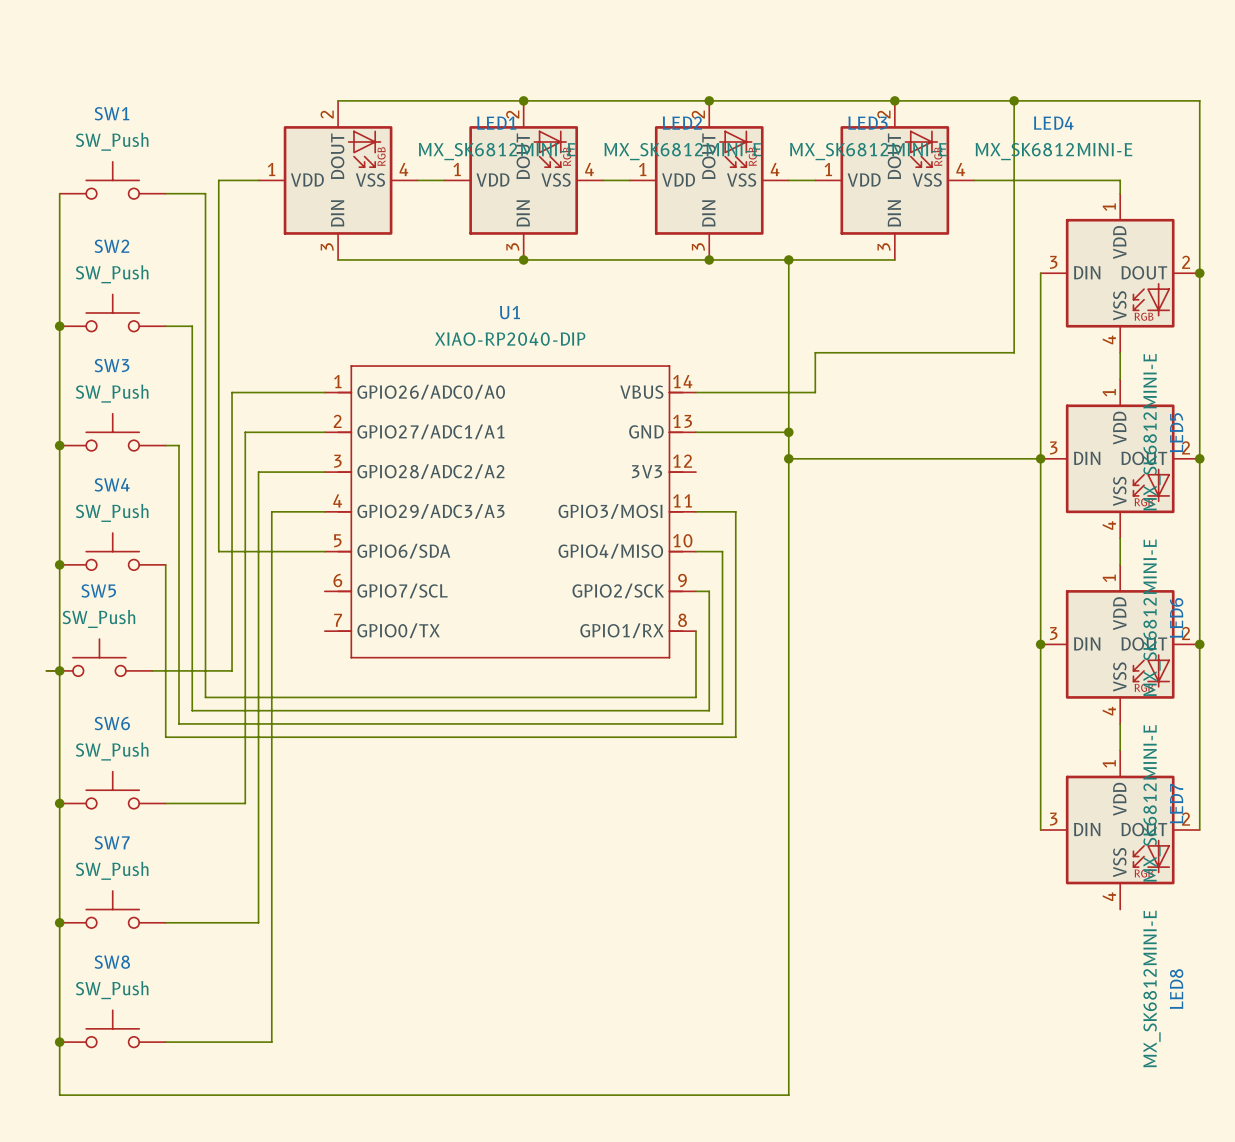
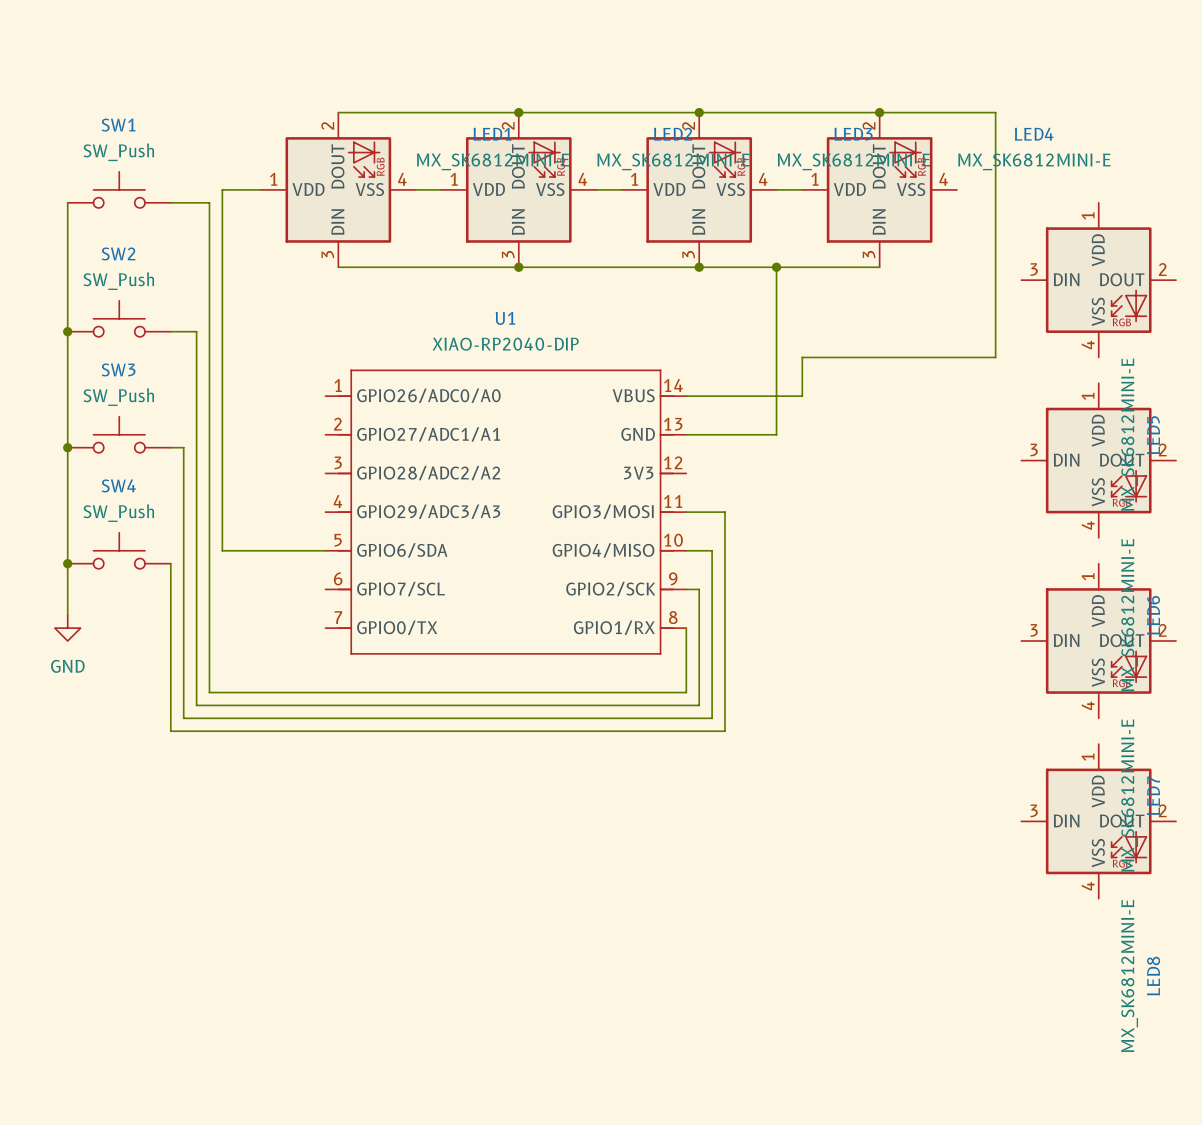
wire: (1014, 100) (1199, 100) (1199, 830) -> none
junction: (1014, 100) -> none
wire: (974, 180) (1120, 180) (1120, 193) -> none
wire: (1040, 273) (1040, 830) -> none
junction: (1199, 273) -> none
wire: (1120, 352) (1120, 379) -> none
wire: (324, 392) (232, 392) (232, 670) (152, 670) -> none
wire: (324, 432) (245, 432) (245, 803) (165, 803) -> none
wire: (788, 432) (788, 1095) (59, 1095) (59, 617) -> none
junction: (788, 432) -> none
wire: (788, 458) (1040, 458) -> none
junction: (788, 458) -> none
junction: (1040, 458) -> none
junction: (1199, 458) -> none
wire: (324, 472) (258, 472) (258, 922) (165, 922) -> none
wire: (324, 511) (271, 511) (271, 1042) (165, 1042) -> none
wire: (1120, 538) (1120, 564) -> none
power symbol: none -> GND (67, 628)
junction: (1040, 644) -> none
junction: (1199, 644) -> none
SW5: SW_Push (99, 657) -> none
wire: (46, 670) (59, 670) -> none
junction: (59, 670) -> none
wire: (1120, 723) (1120, 750) -> none
SW6: SW_Push (112, 790) -> none
junction: (59, 803) -> none
SW7: SW_Push (112, 909) -> none
junction: (59, 922) -> none
SW8: SW_Push (112, 1028) -> none
junction: (59, 1042) -> none

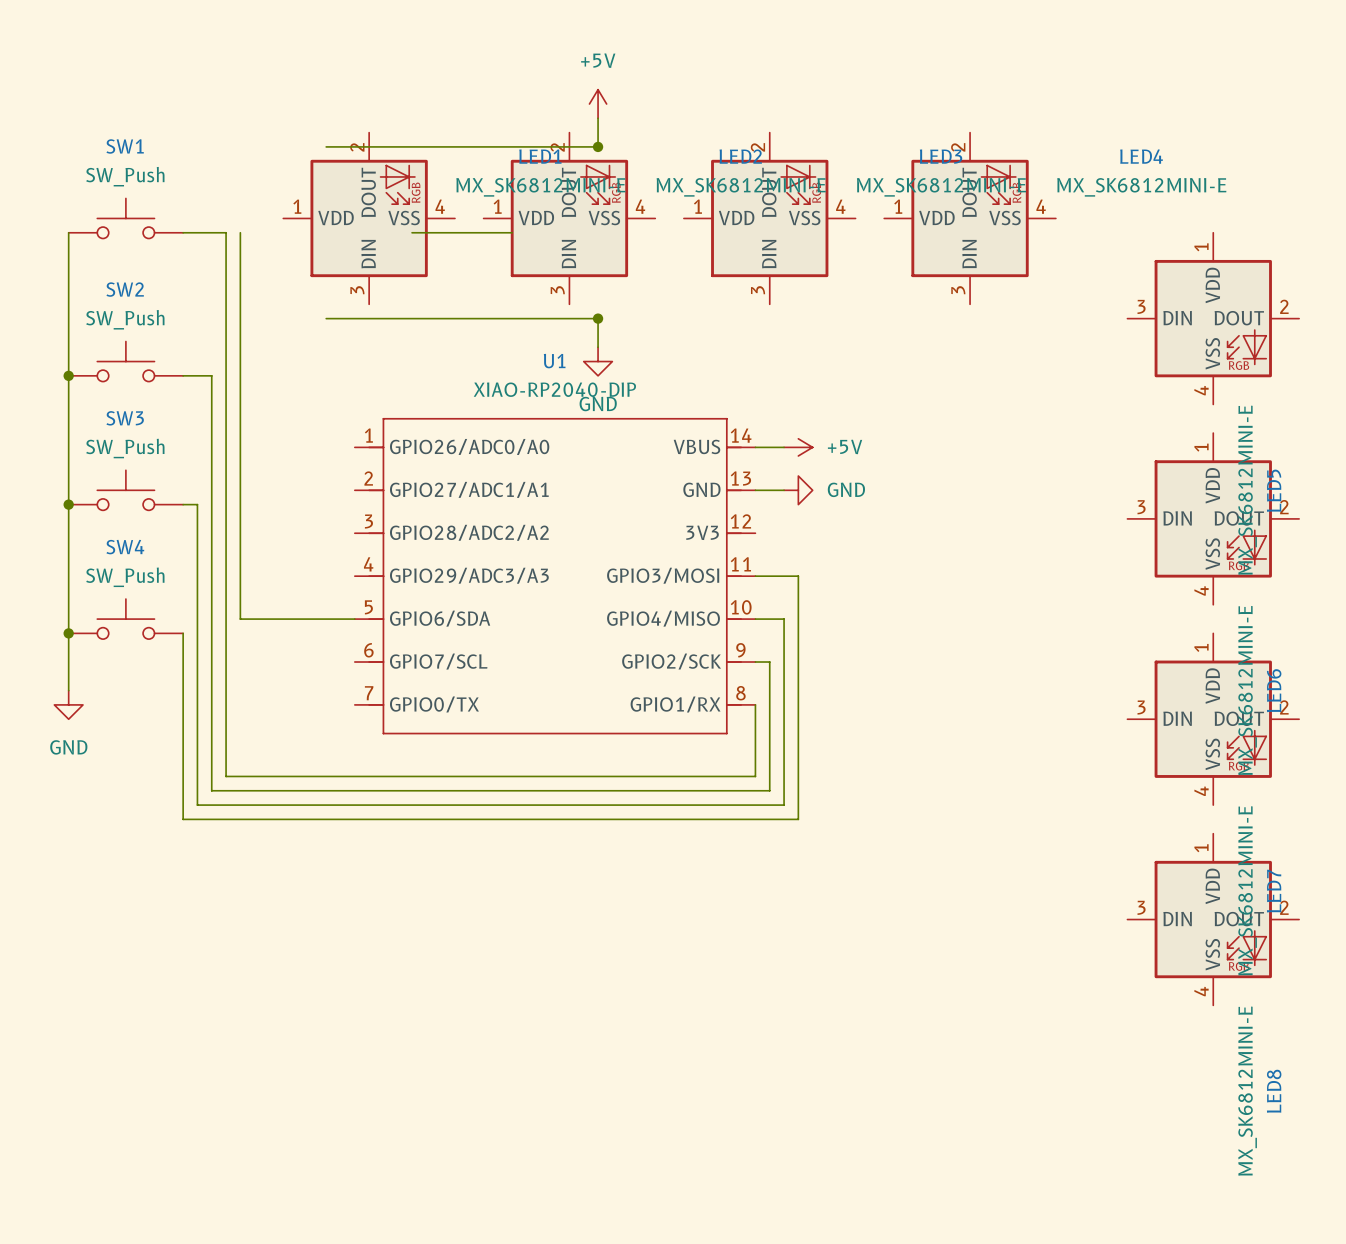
power symbol: none -> +5V (598, 104)
wire: none -> (598, 118) (598, 146) (326, 146)
wire: (338, 112) (995, 112) (995, 357) (802, 357) (802, 396) (712, 396) -> none
junction position: (518, 112) -> (598, 146)
junction: (699, 112) -> none
junction: (879, 112) -> none
wire: (261, 189) (222, 189) (222, 202) -> none
wire: (415, 189) (441, 189) -> none
wire: (596, 189) (621, 189) -> none
wire: (776, 189) (802, 189) -> none
wire: none -> (412, 232) (512, 232)
wire: (338, 267) (879, 267) -> none
junction position: (518, 267) -> (598, 318)
junction: (699, 267) -> none
wire: (776, 267) (776, 434) (712, 434) -> none
junction: (776, 267) -> none
wire: none -> (326, 318) (598, 318) (598, 347)
power symbol: none -> GND (598, 361)
power symbol: none -> +5V (798, 447)
power symbol: none -> GND (798, 490)

